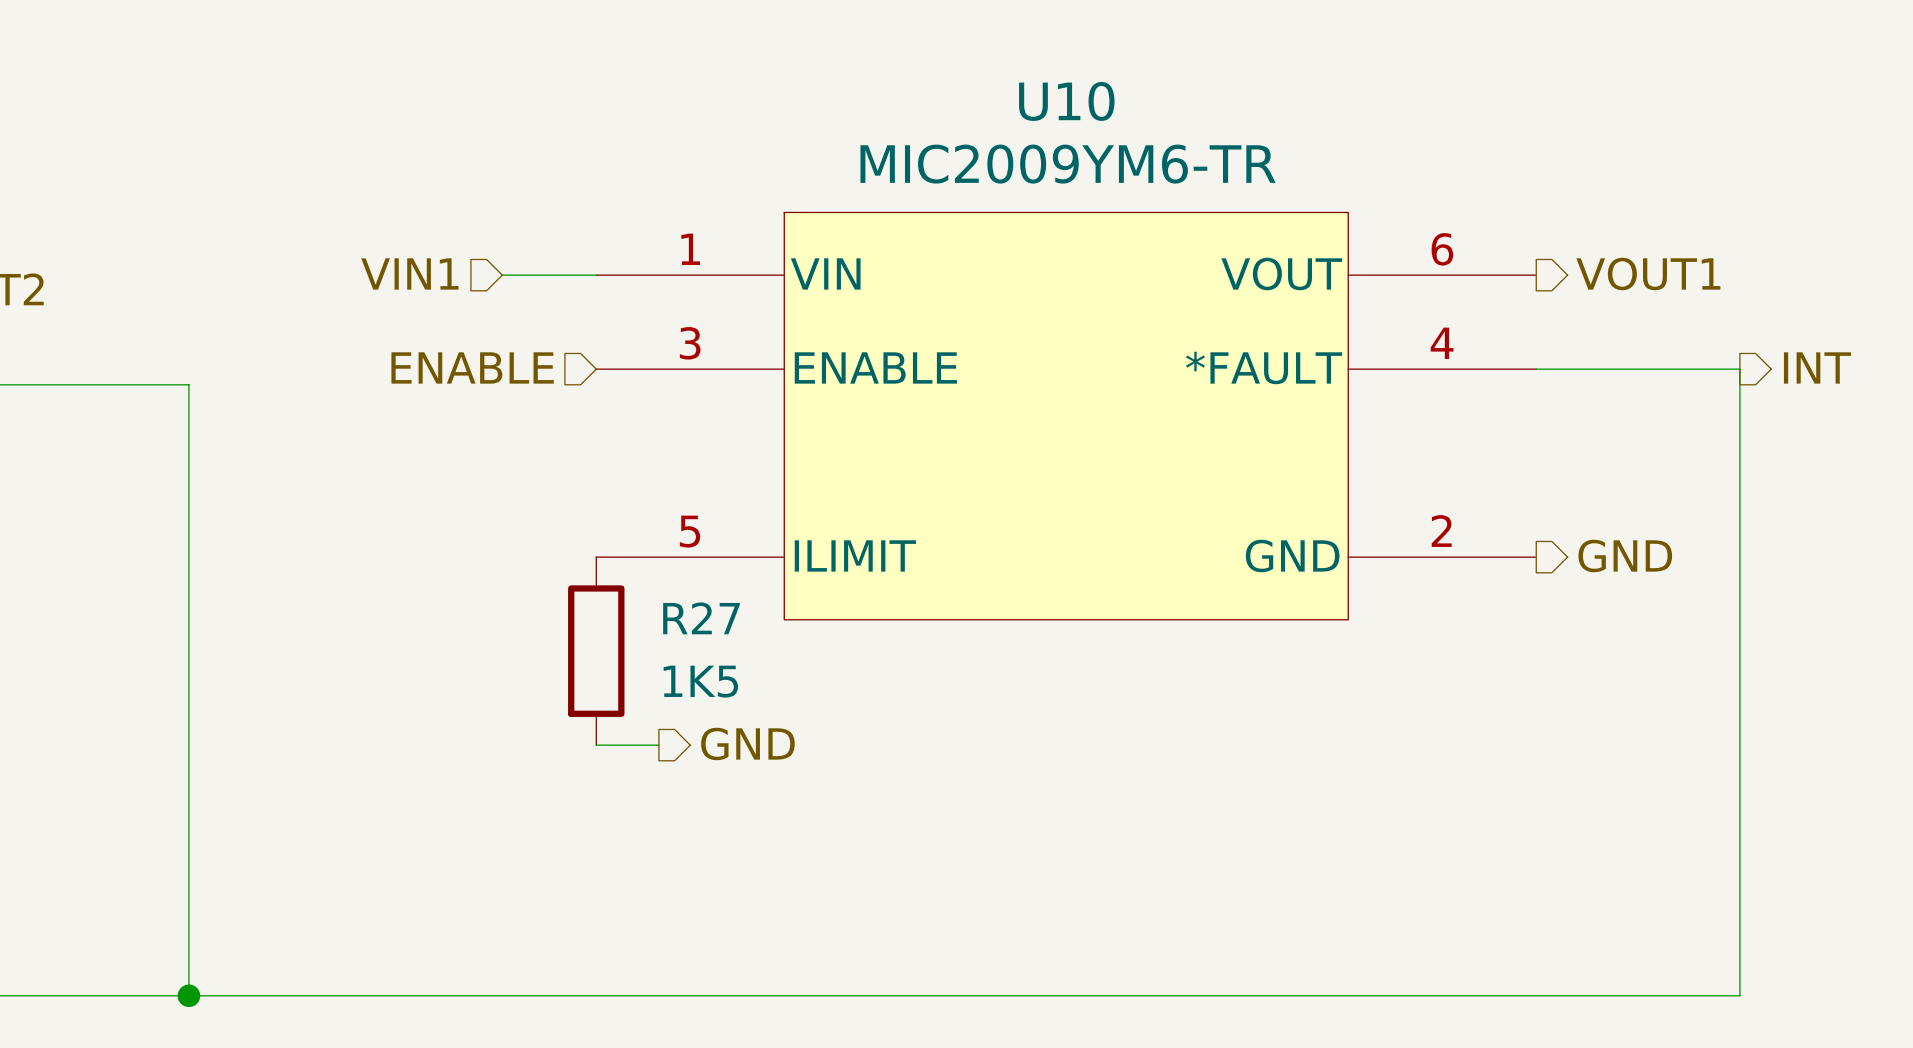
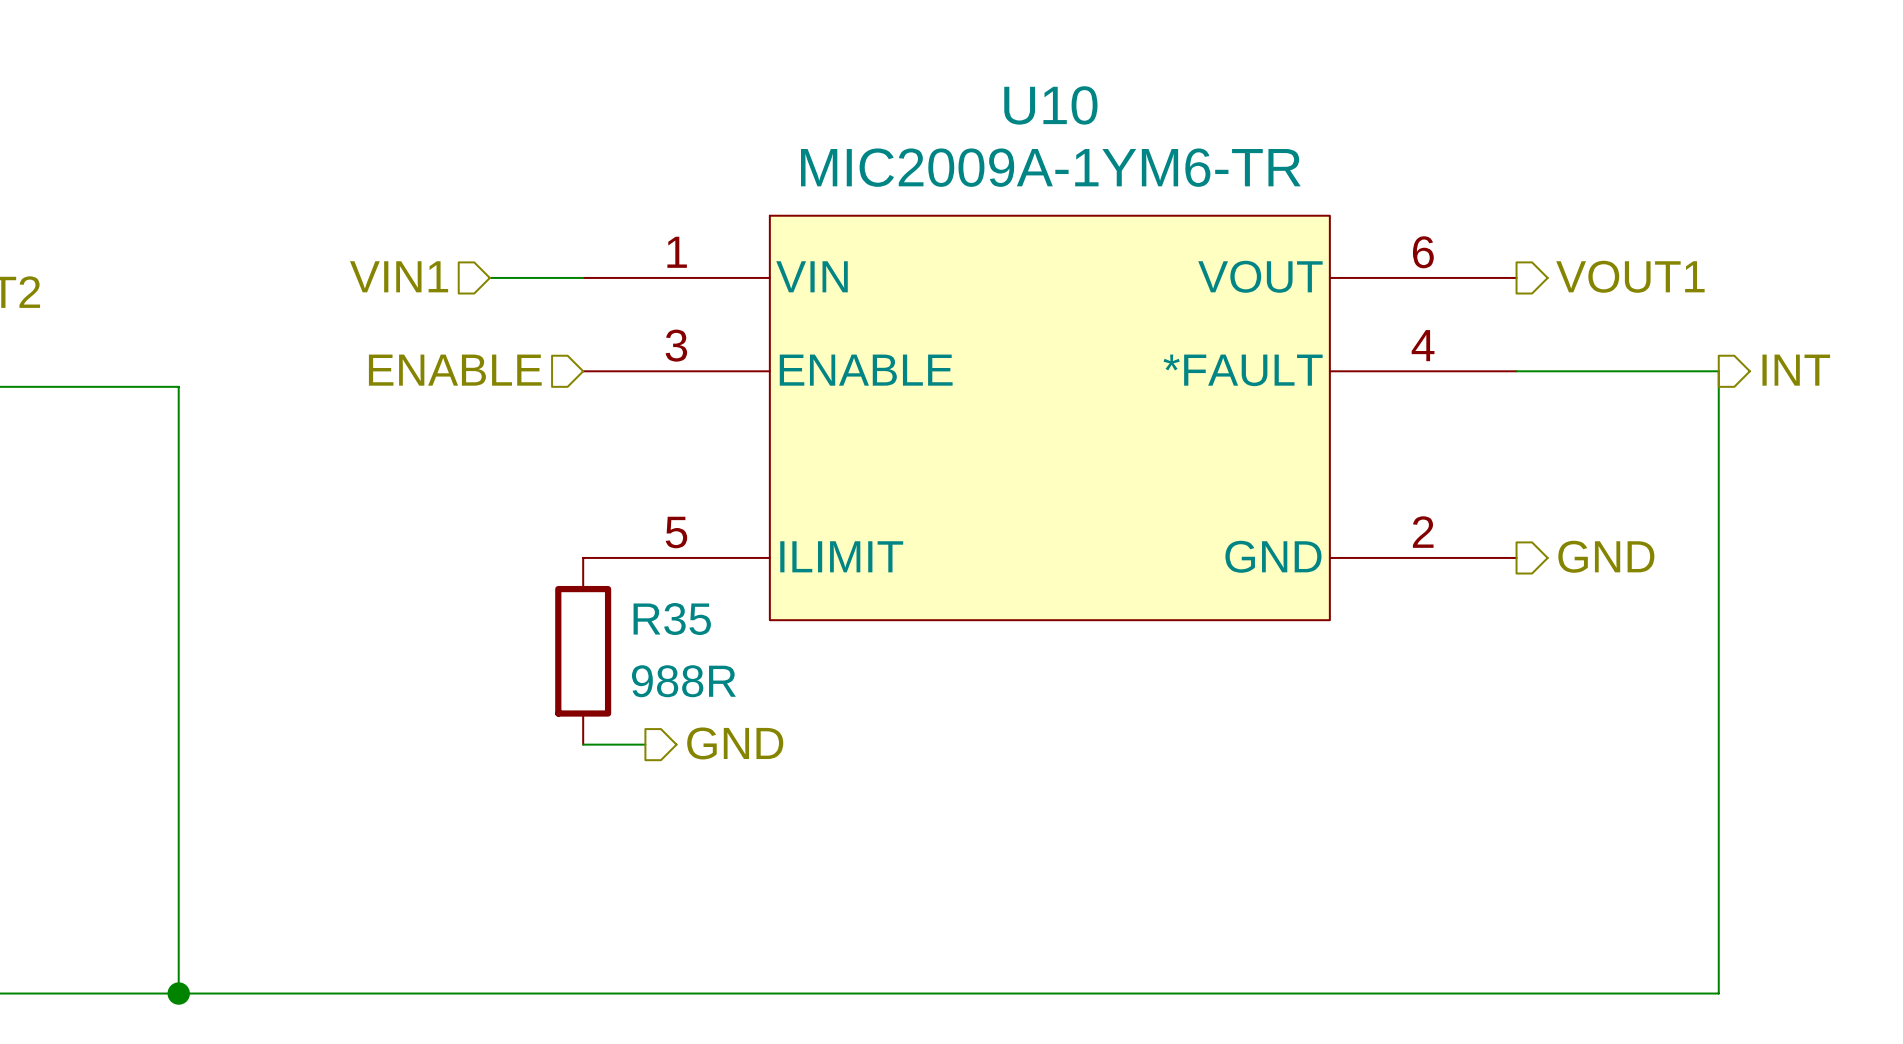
U10 value: MIC2009YM6-TR (1068, 164) -> MIC2009A-1YM6-TR (1050, 167)
R27 name: R27 (701, 618) -> R35 (672, 619)
R27 value: 1K5 (700, 681) -> 988R (683, 681)

